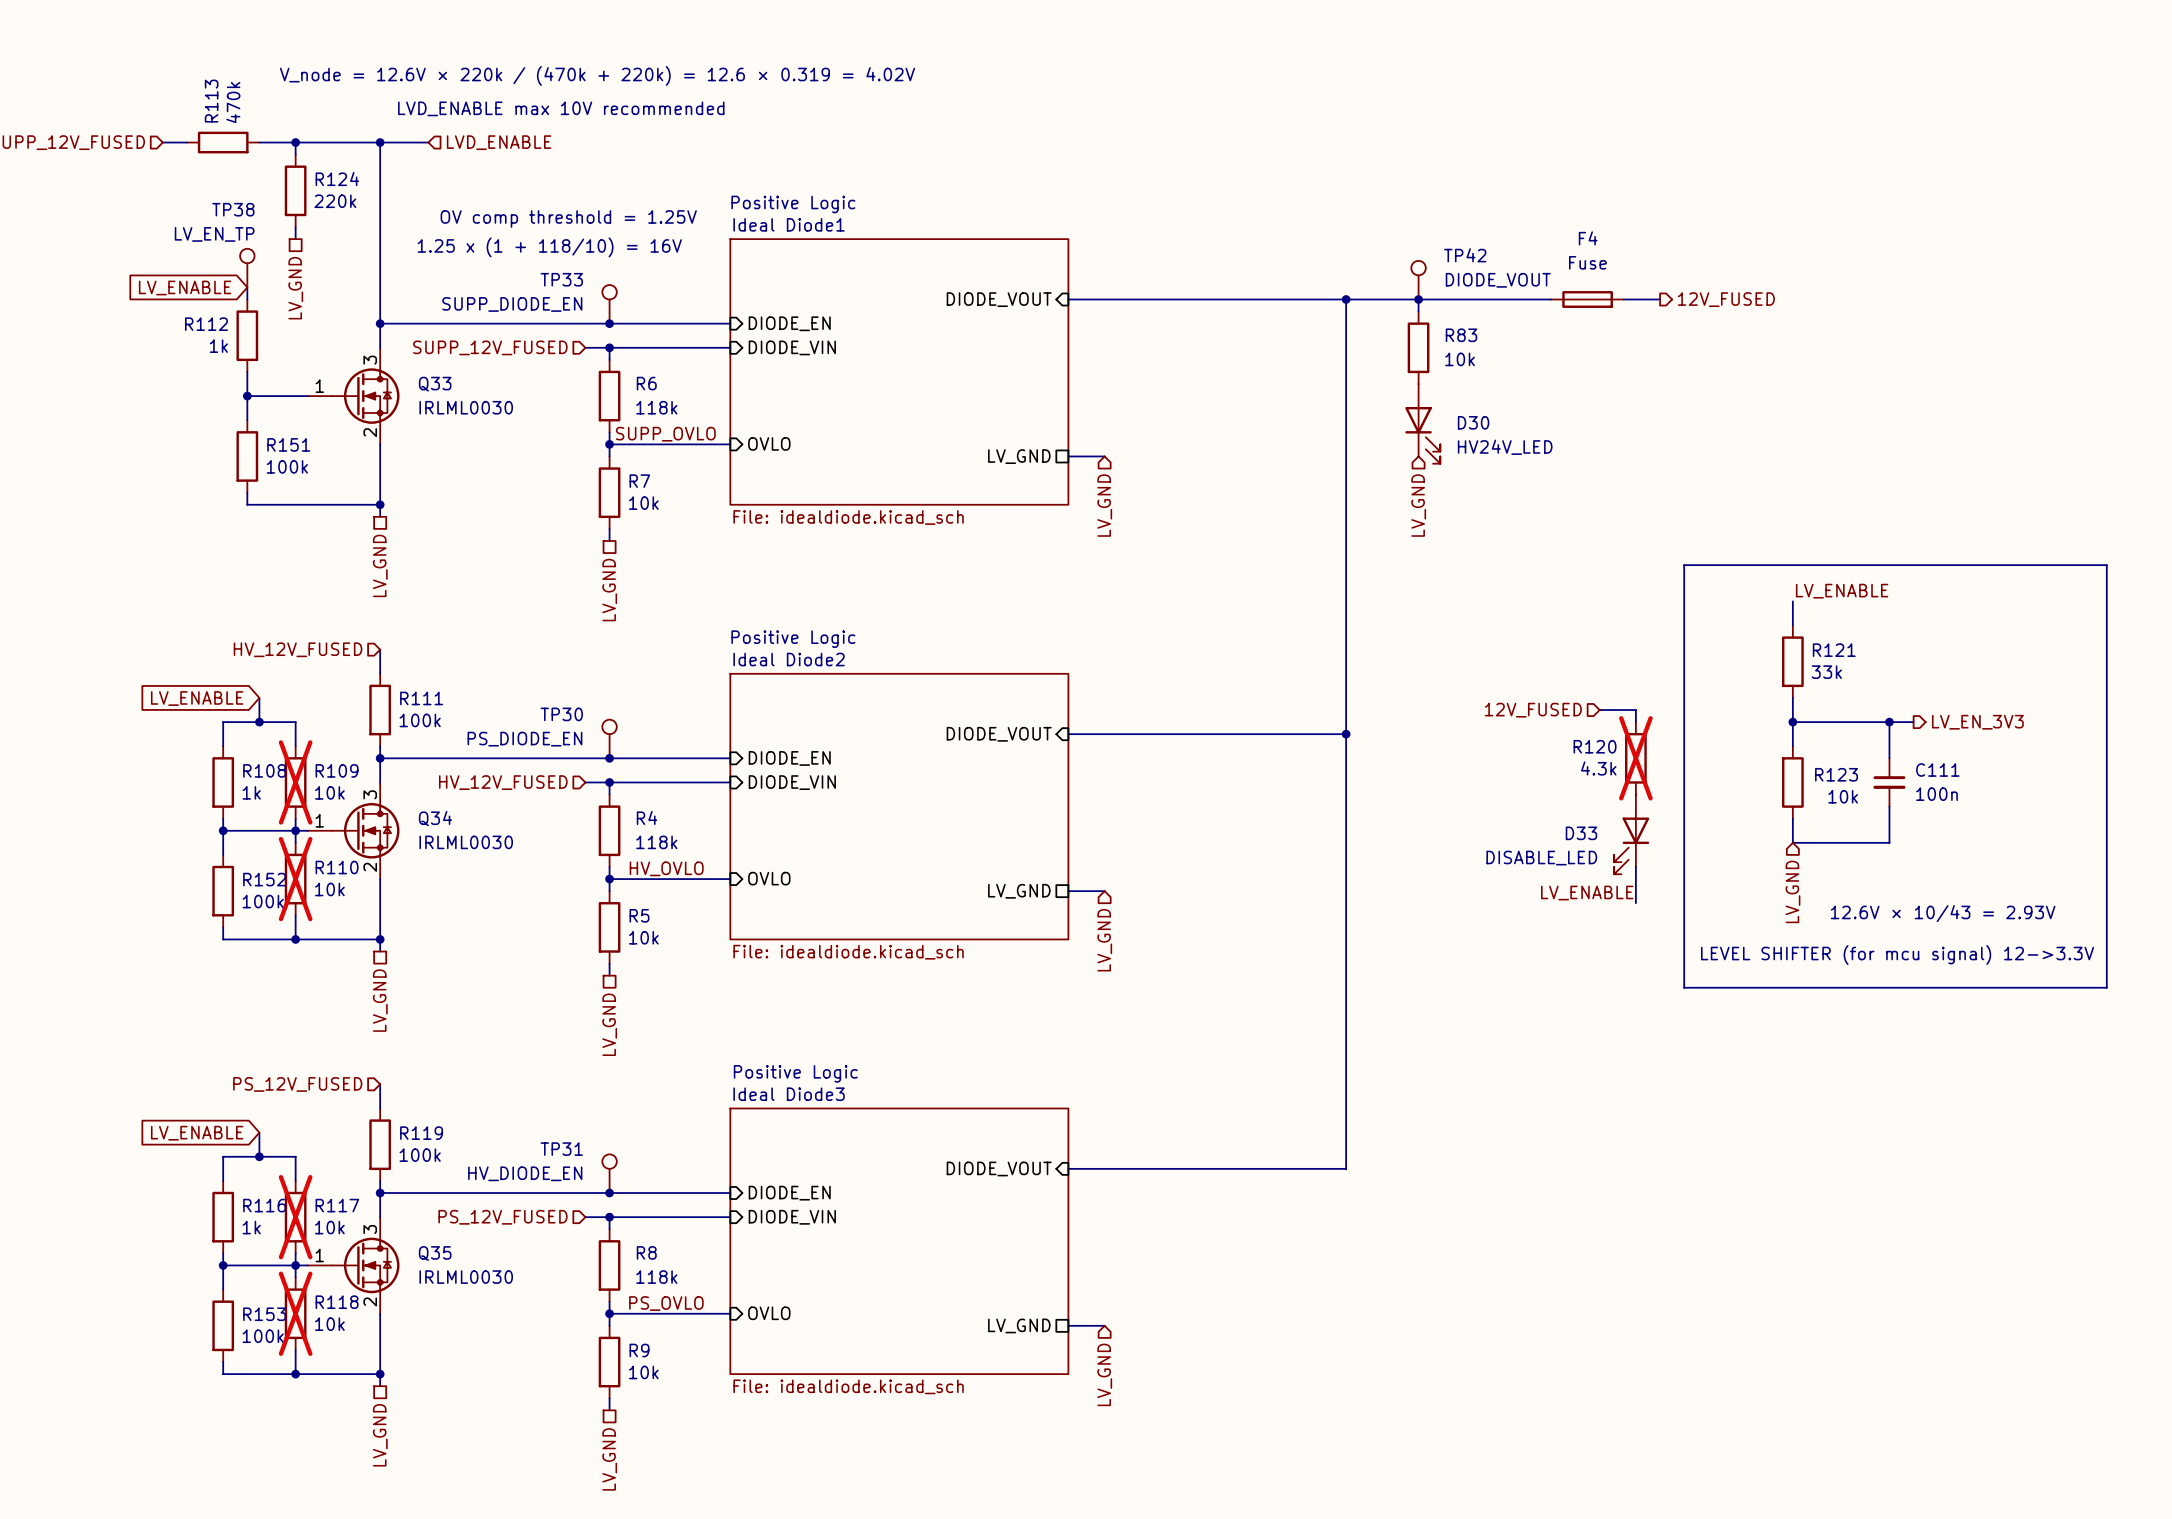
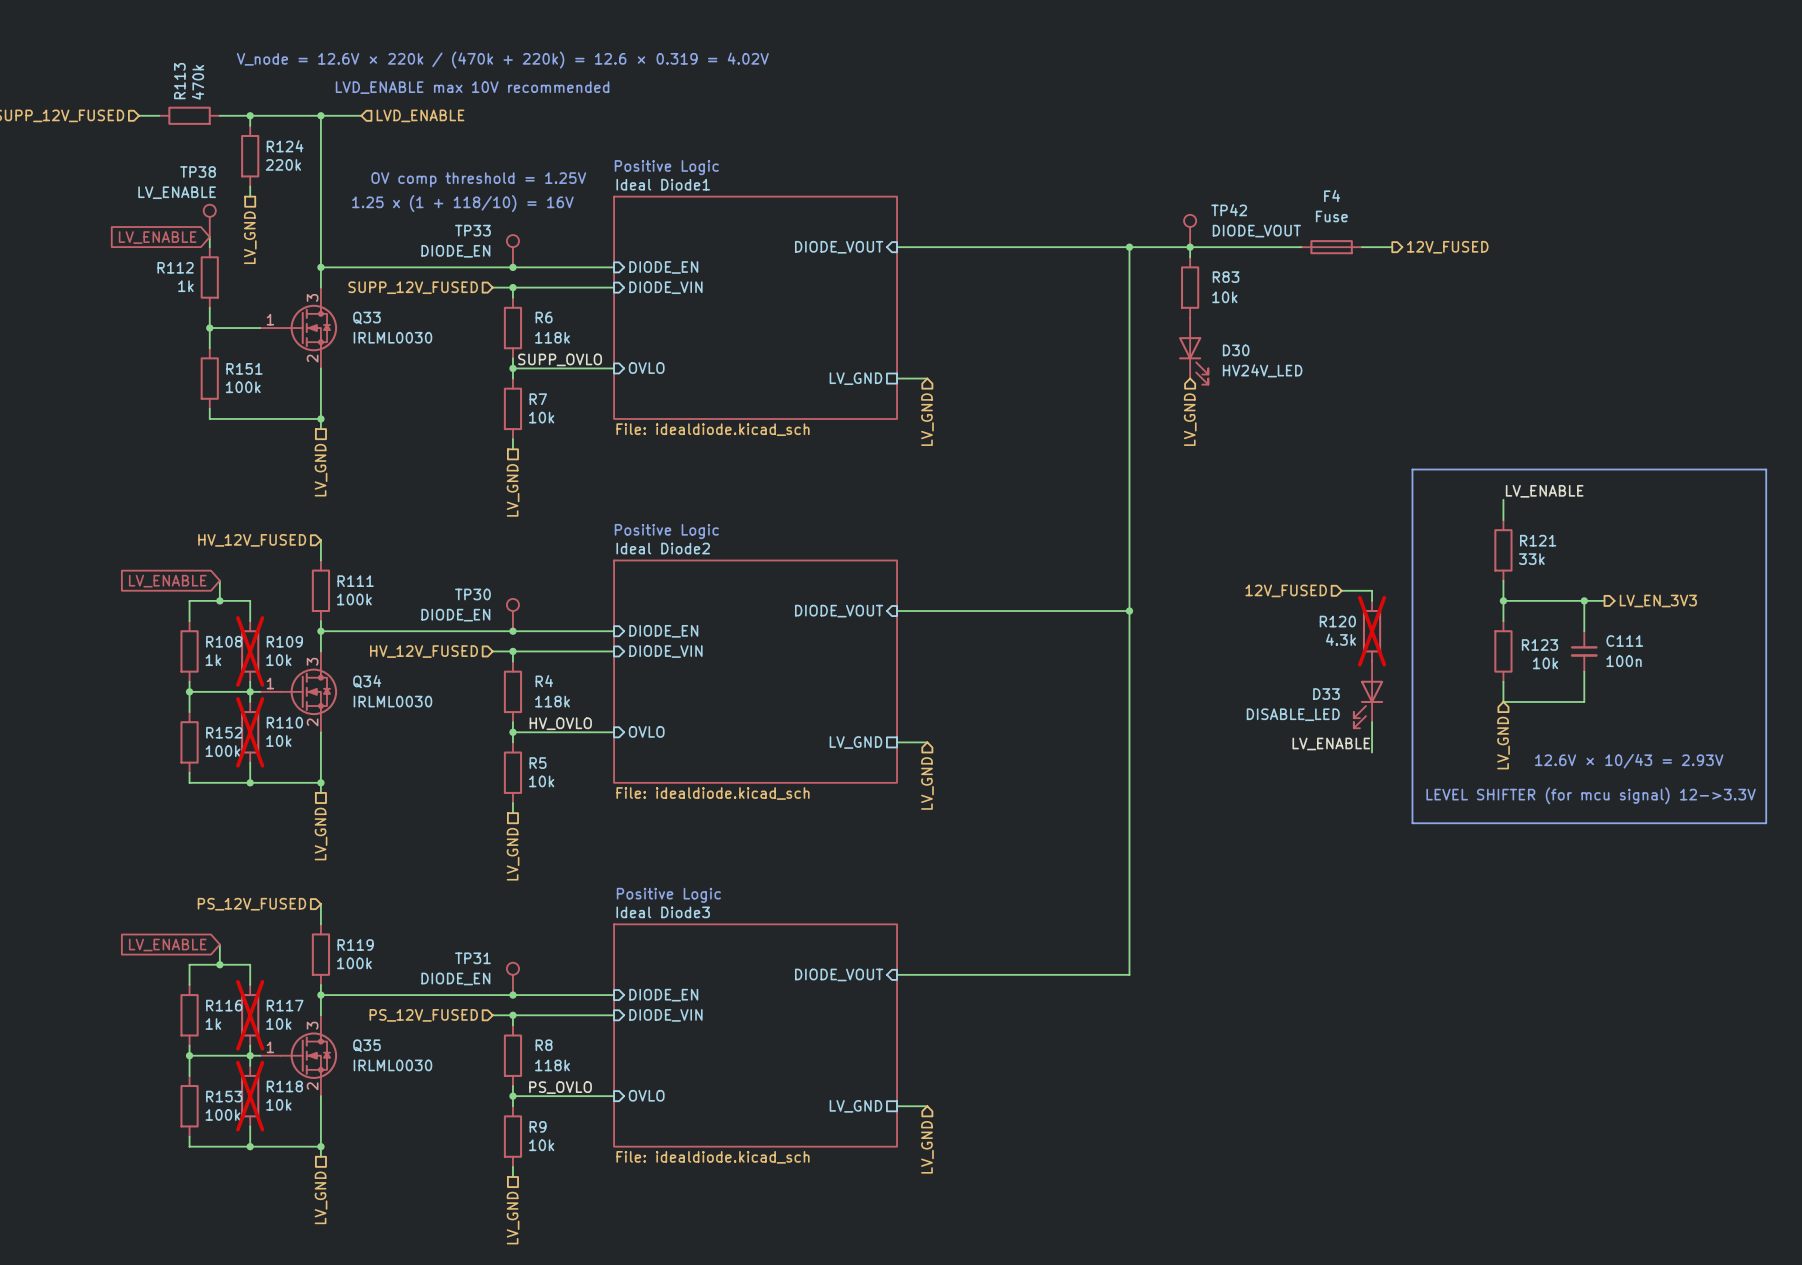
TP38 value: LV_EN_TP (214, 234) -> LV_ENABLE (177, 192)
TP33 value: SUPP_DIODE_EN (512, 304) -> DIODE_EN (455, 251)
TP30 value: PS_DIODE_EN (524, 739) -> DIODE_EN (455, 615)
TP31 value: HV_DIODE_EN (525, 1173) -> DIODE_EN (455, 979)

